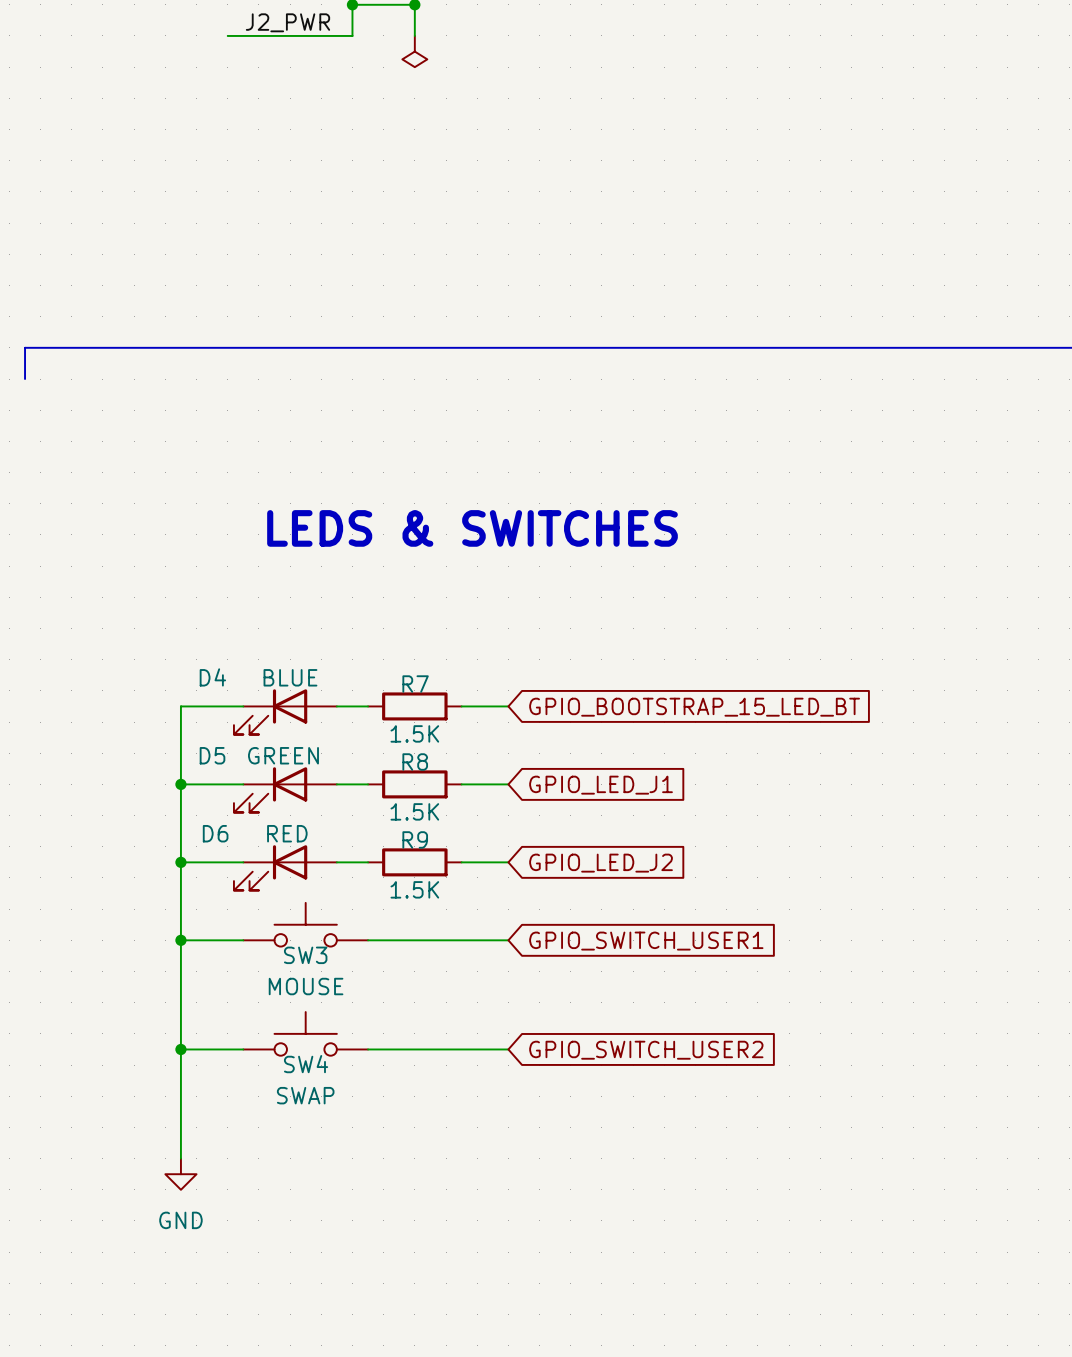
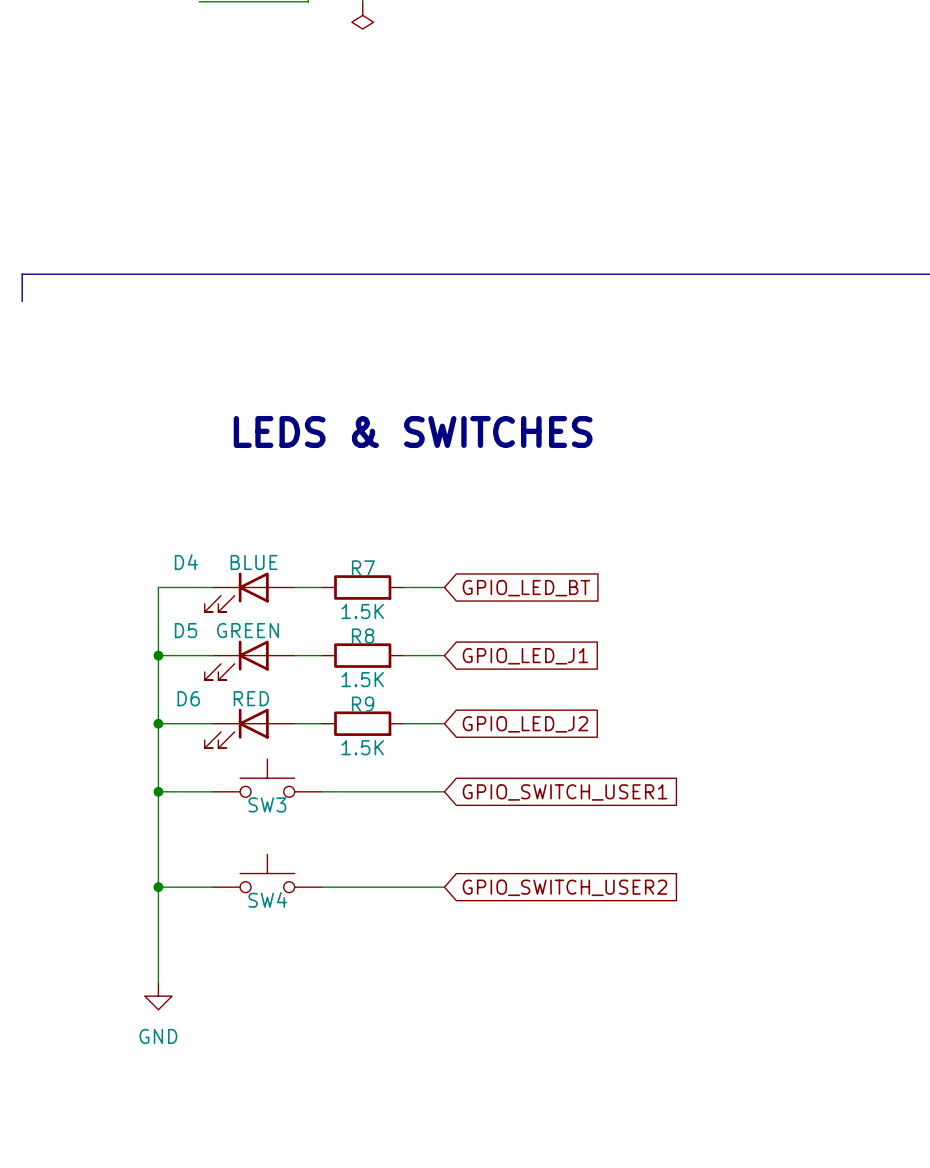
global label: GPIO_BOOTSTRAP_15_LED_BT (694, 707) -> GPIO_LED_BT (526, 588)
SW3 value: MOUSE (306, 986) -> none
SW4 value: SWAP (305, 1095) -> none

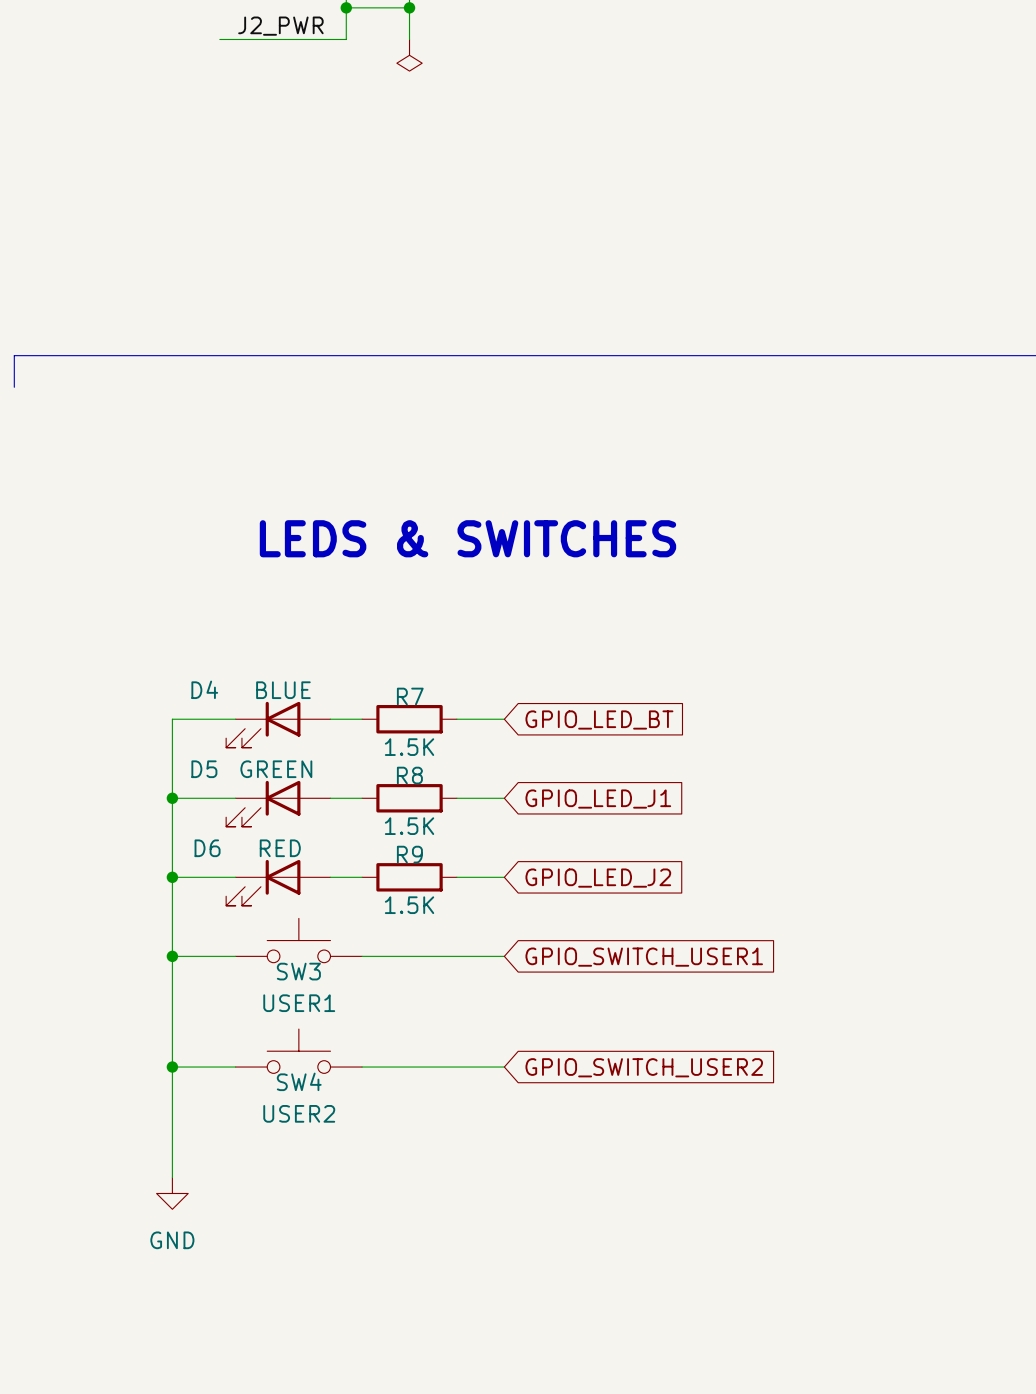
SW3 value: none -> USER1 (299, 1003)
SW4 value: none -> USER2 (299, 1113)

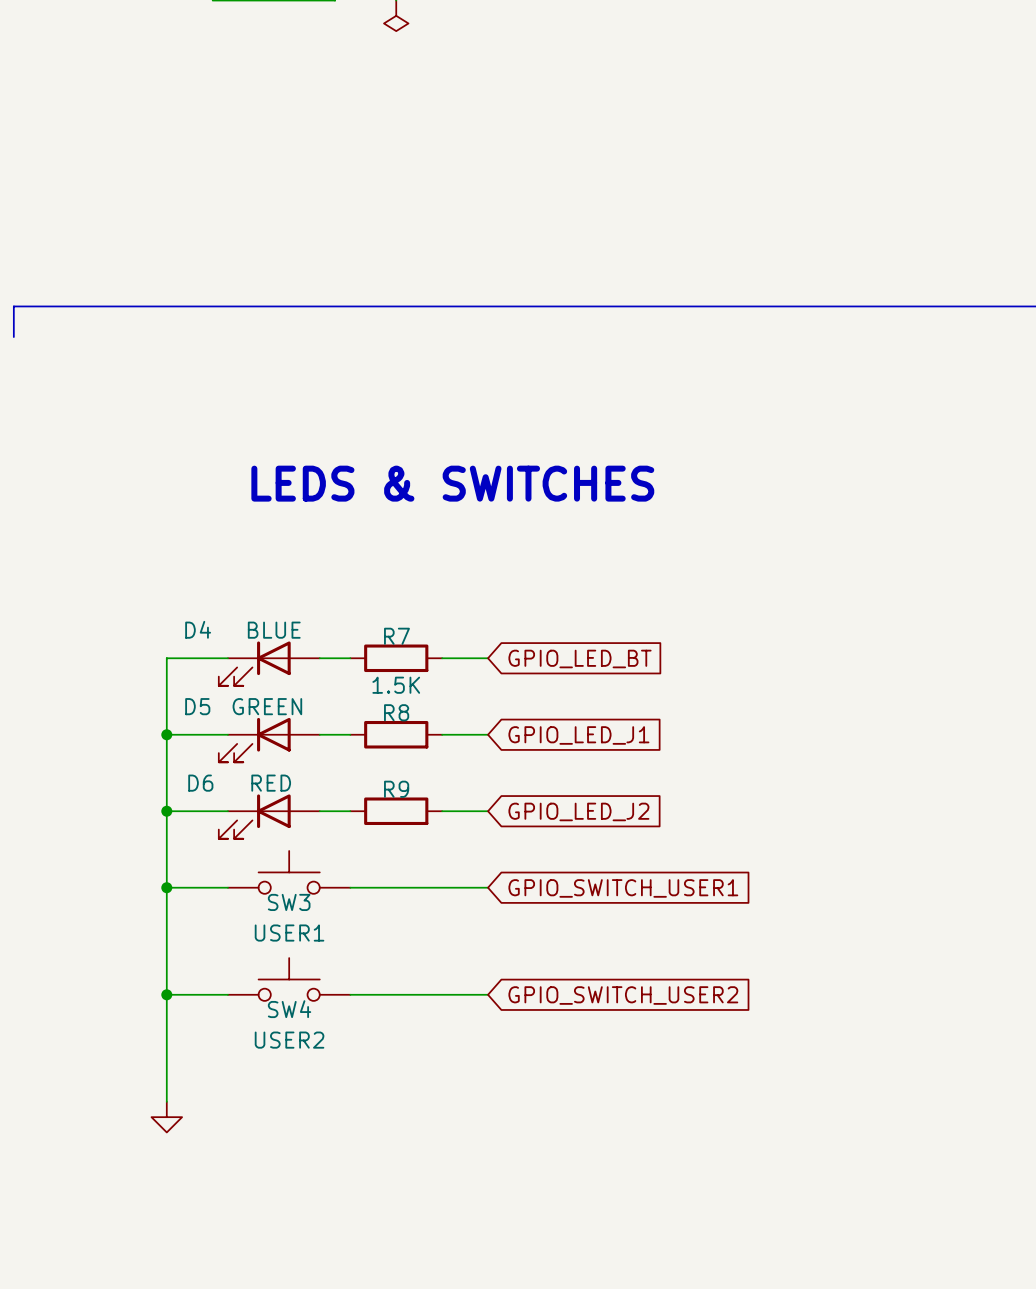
R8 value: 1.5K (409, 826) -> none
R9 value: 1.5K (409, 905) -> none
power symbol text: GND (172, 1240) -> none

